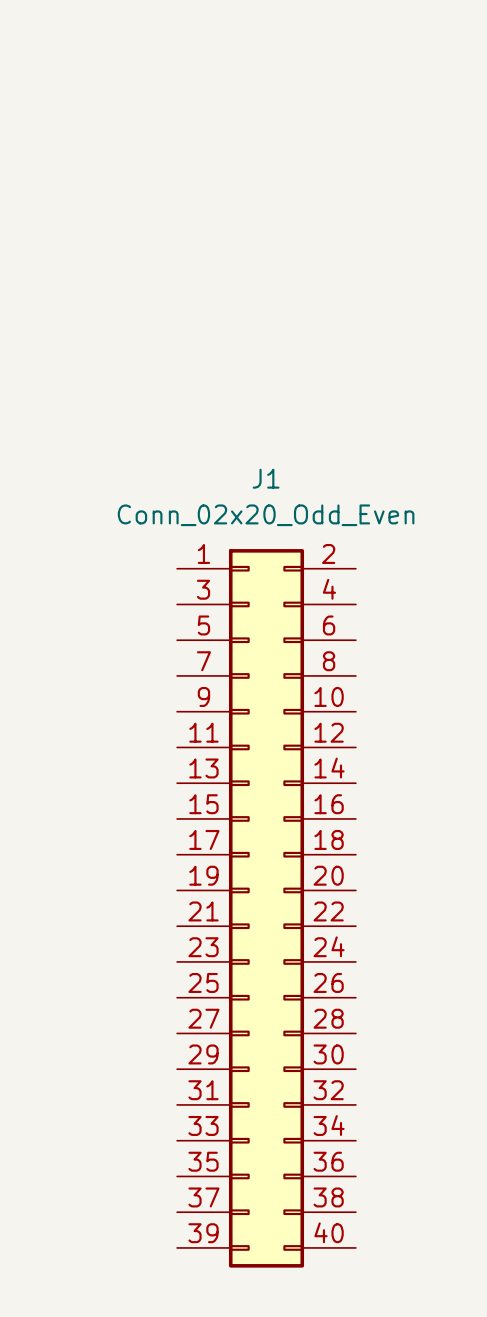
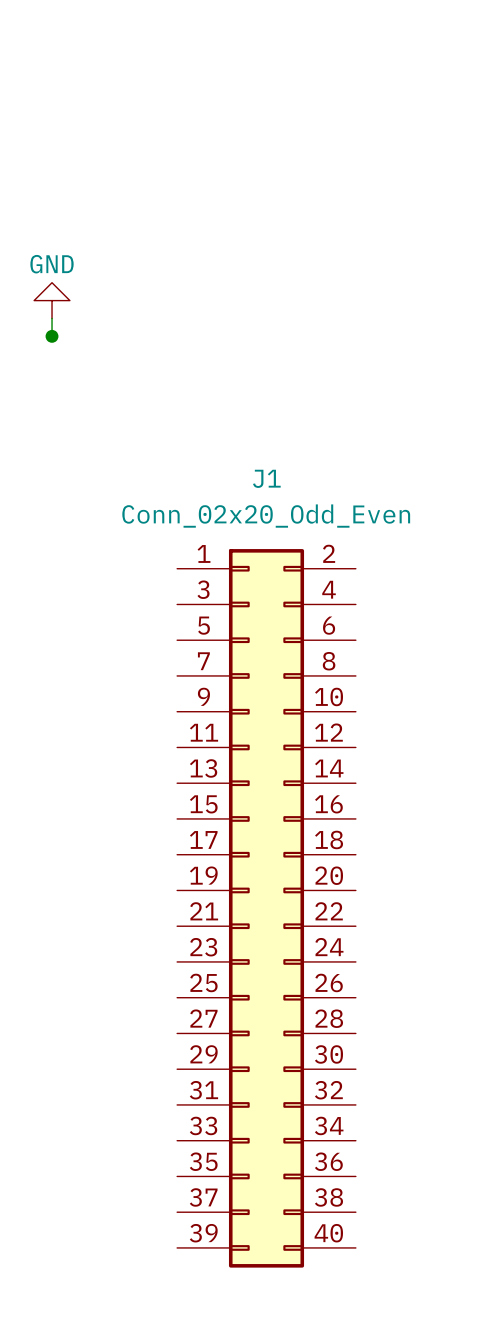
power symbol: none -> GND (52, 300)
wire: none -> (52, 318) (52, 336)
junction: none -> (52, 336)

